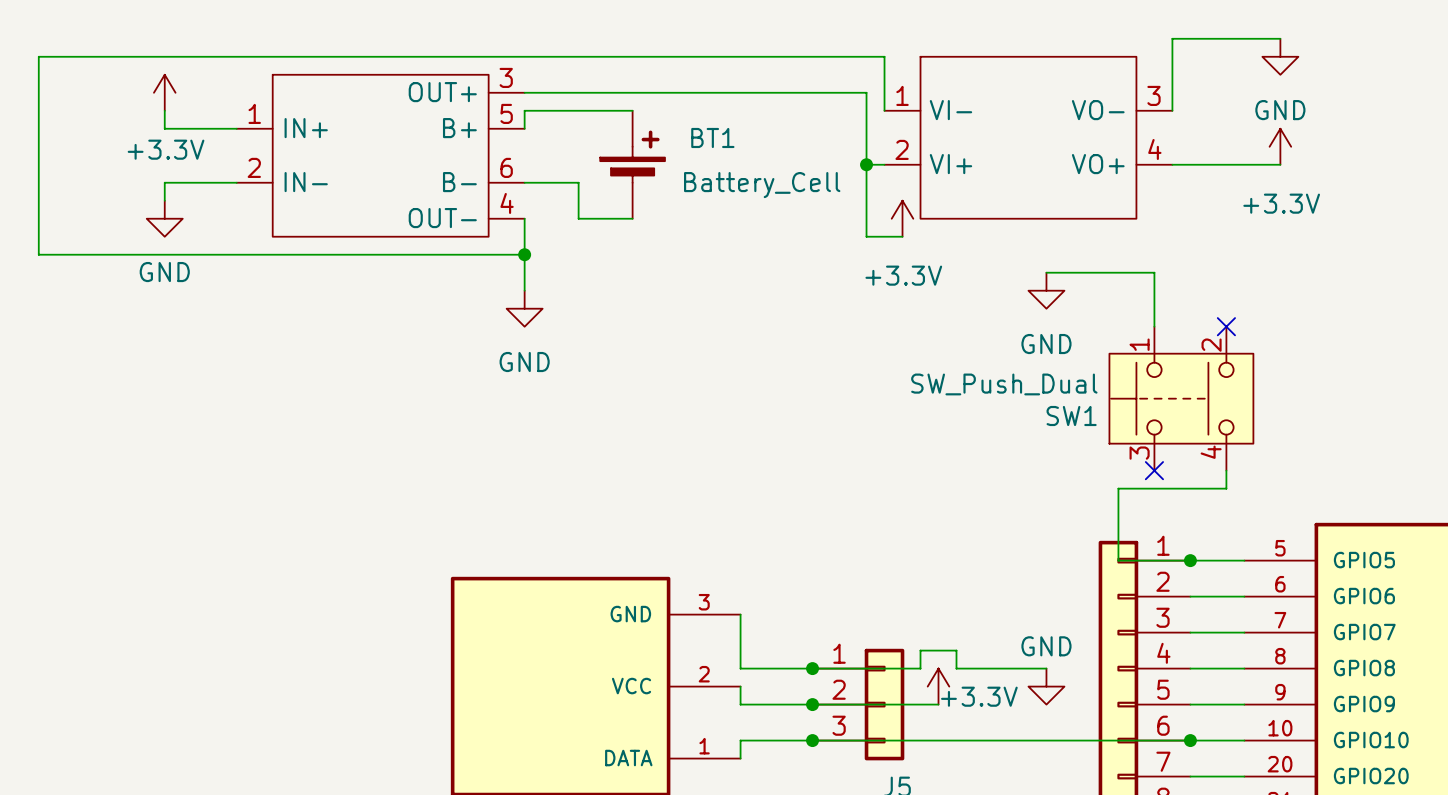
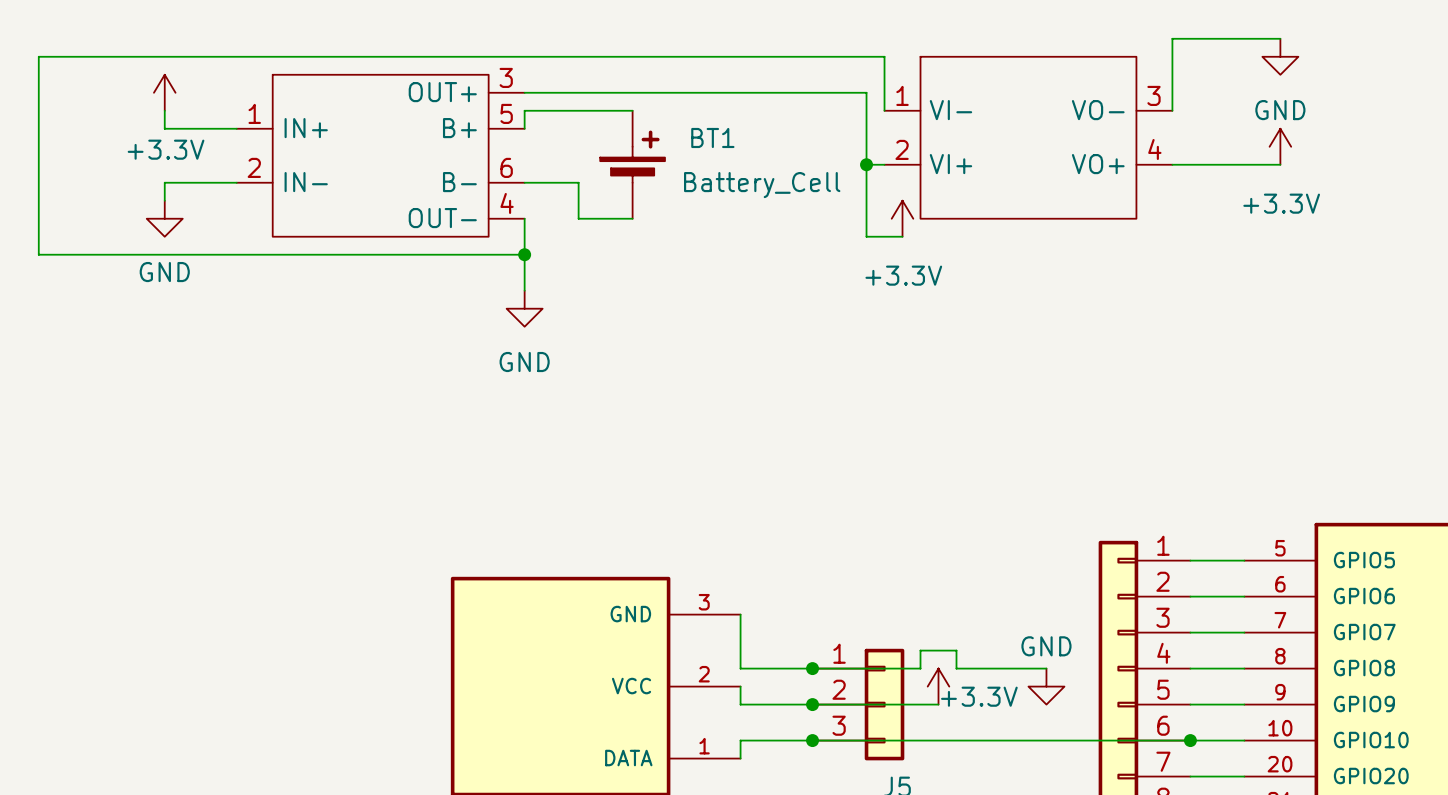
wire: (1046, 272) (1154, 272) (1154, 326) -> none
power symbol: GND (1046, 290) -> none
no-connect mark: (1226, 326) -> none
SW1: SW_Push_Dual (1181, 398) -> none
no-connect mark: (1154, 470) -> none
wire: (1226, 470) (1226, 488) (1118, 488) (1118, 560) (1190, 560) -> none
junction: (1190, 560) -> none

